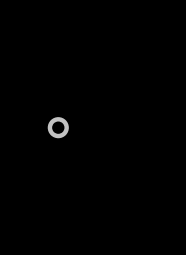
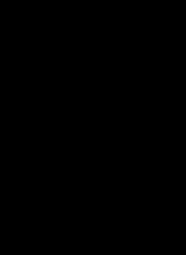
via: (58, 127) -> none

